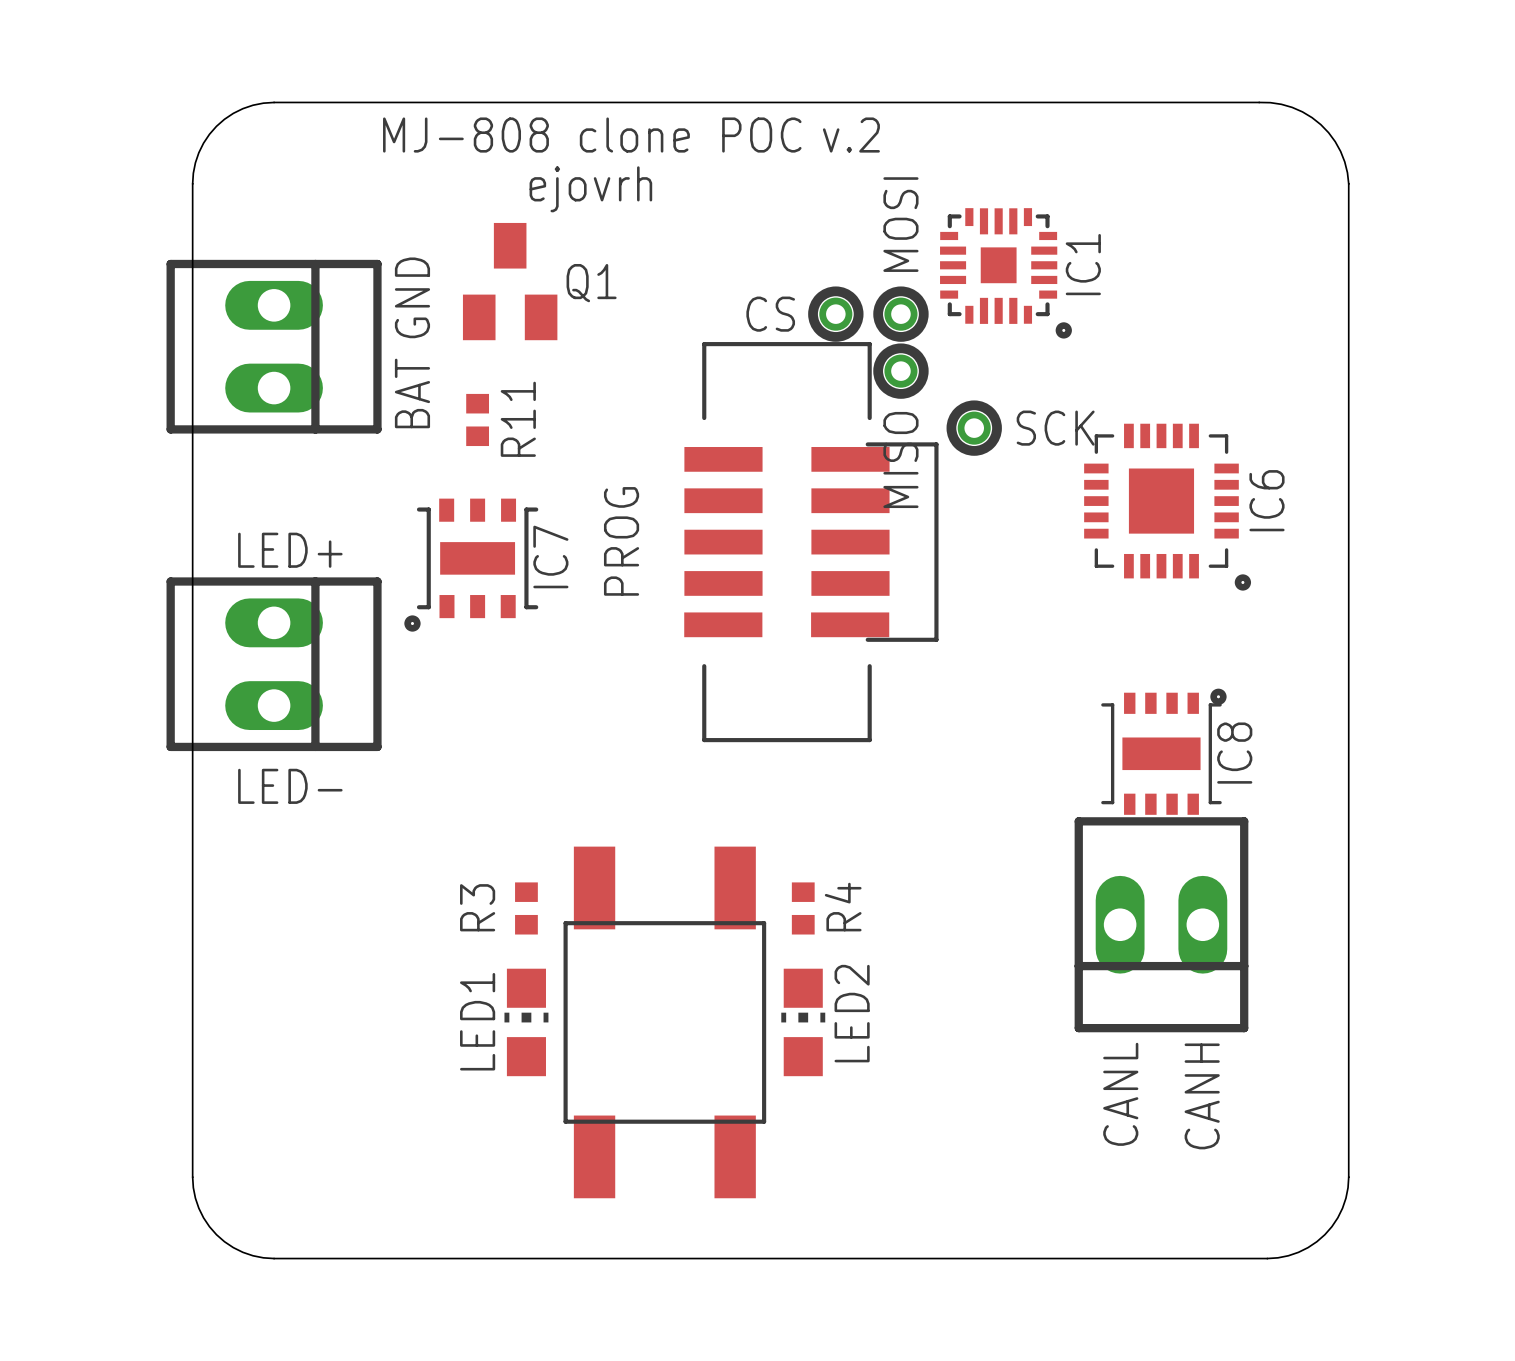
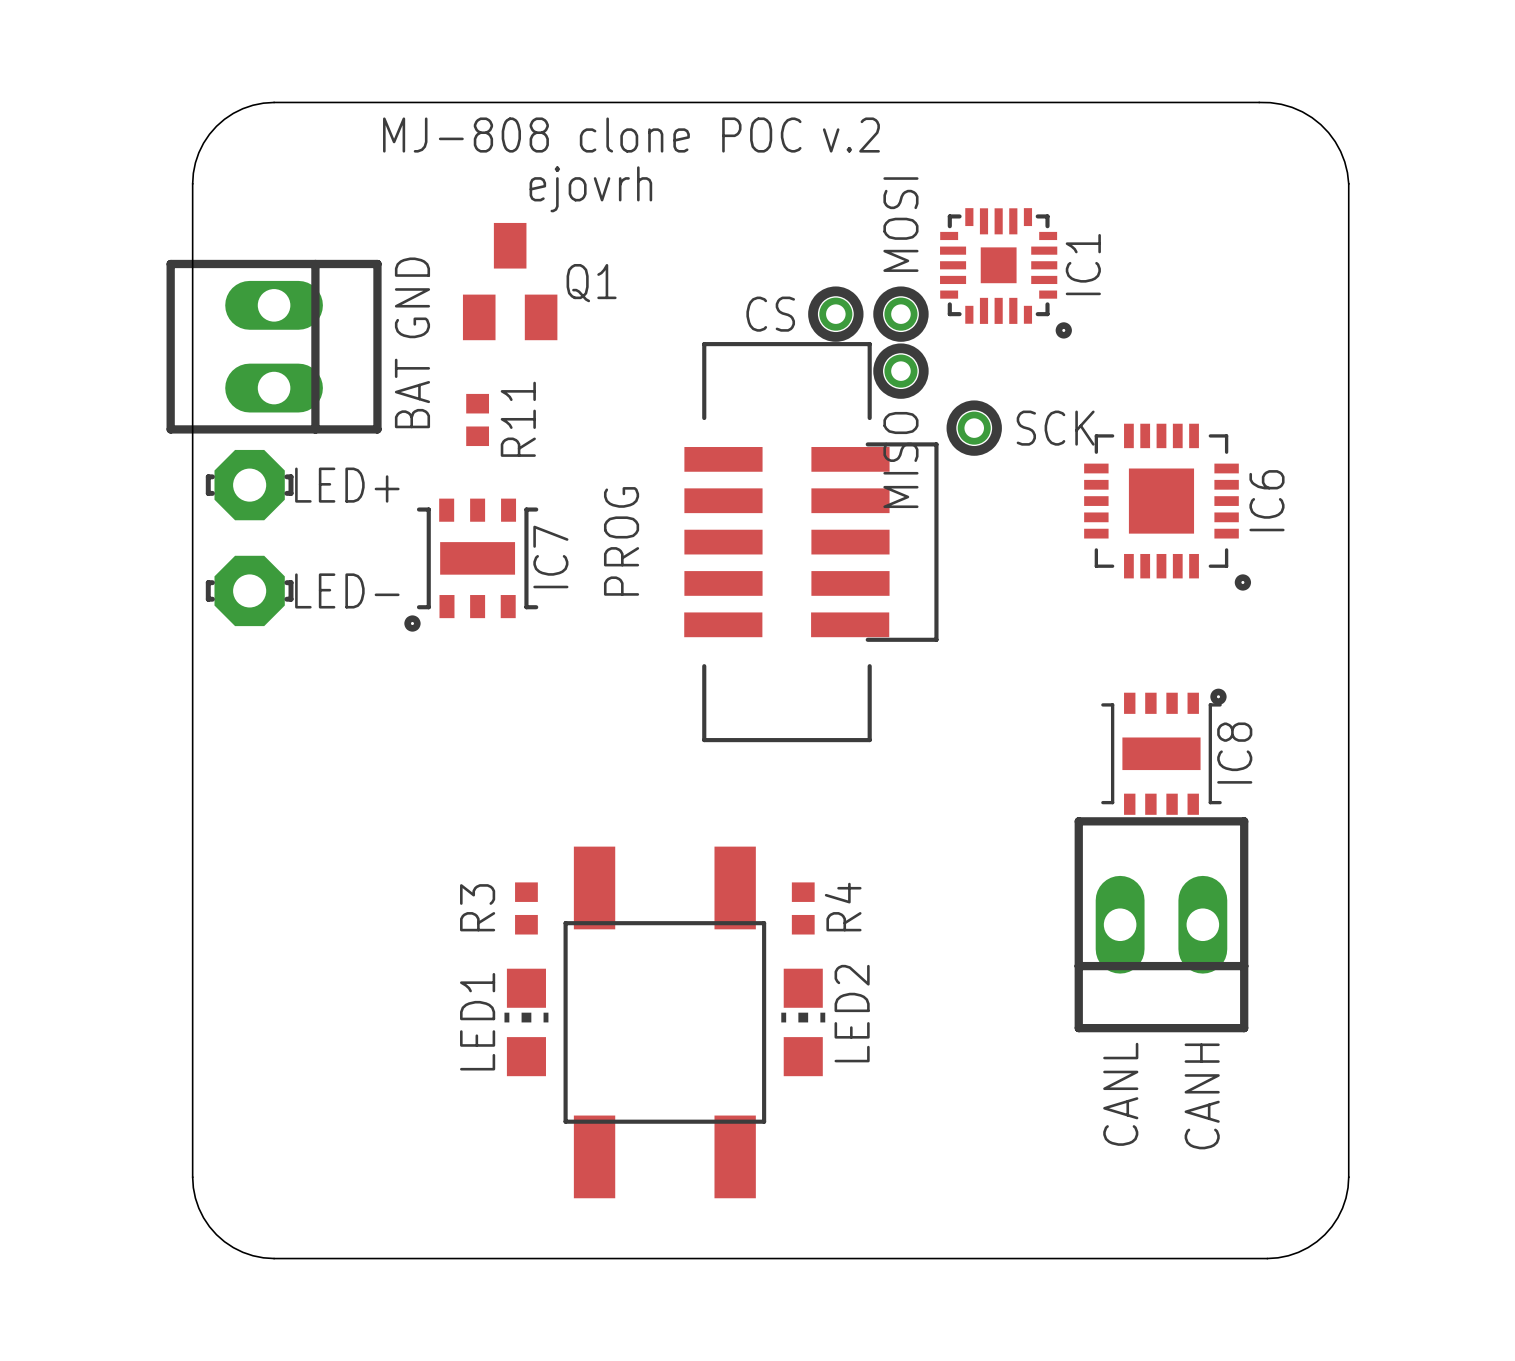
part: none -> (249, 485)
text position: LED+ (290, 550) -> LED+ (347, 485)
part: none -> (249, 590)
part: (274, 664) -> none
text position: LED- (290, 786) -> LED- (347, 590)

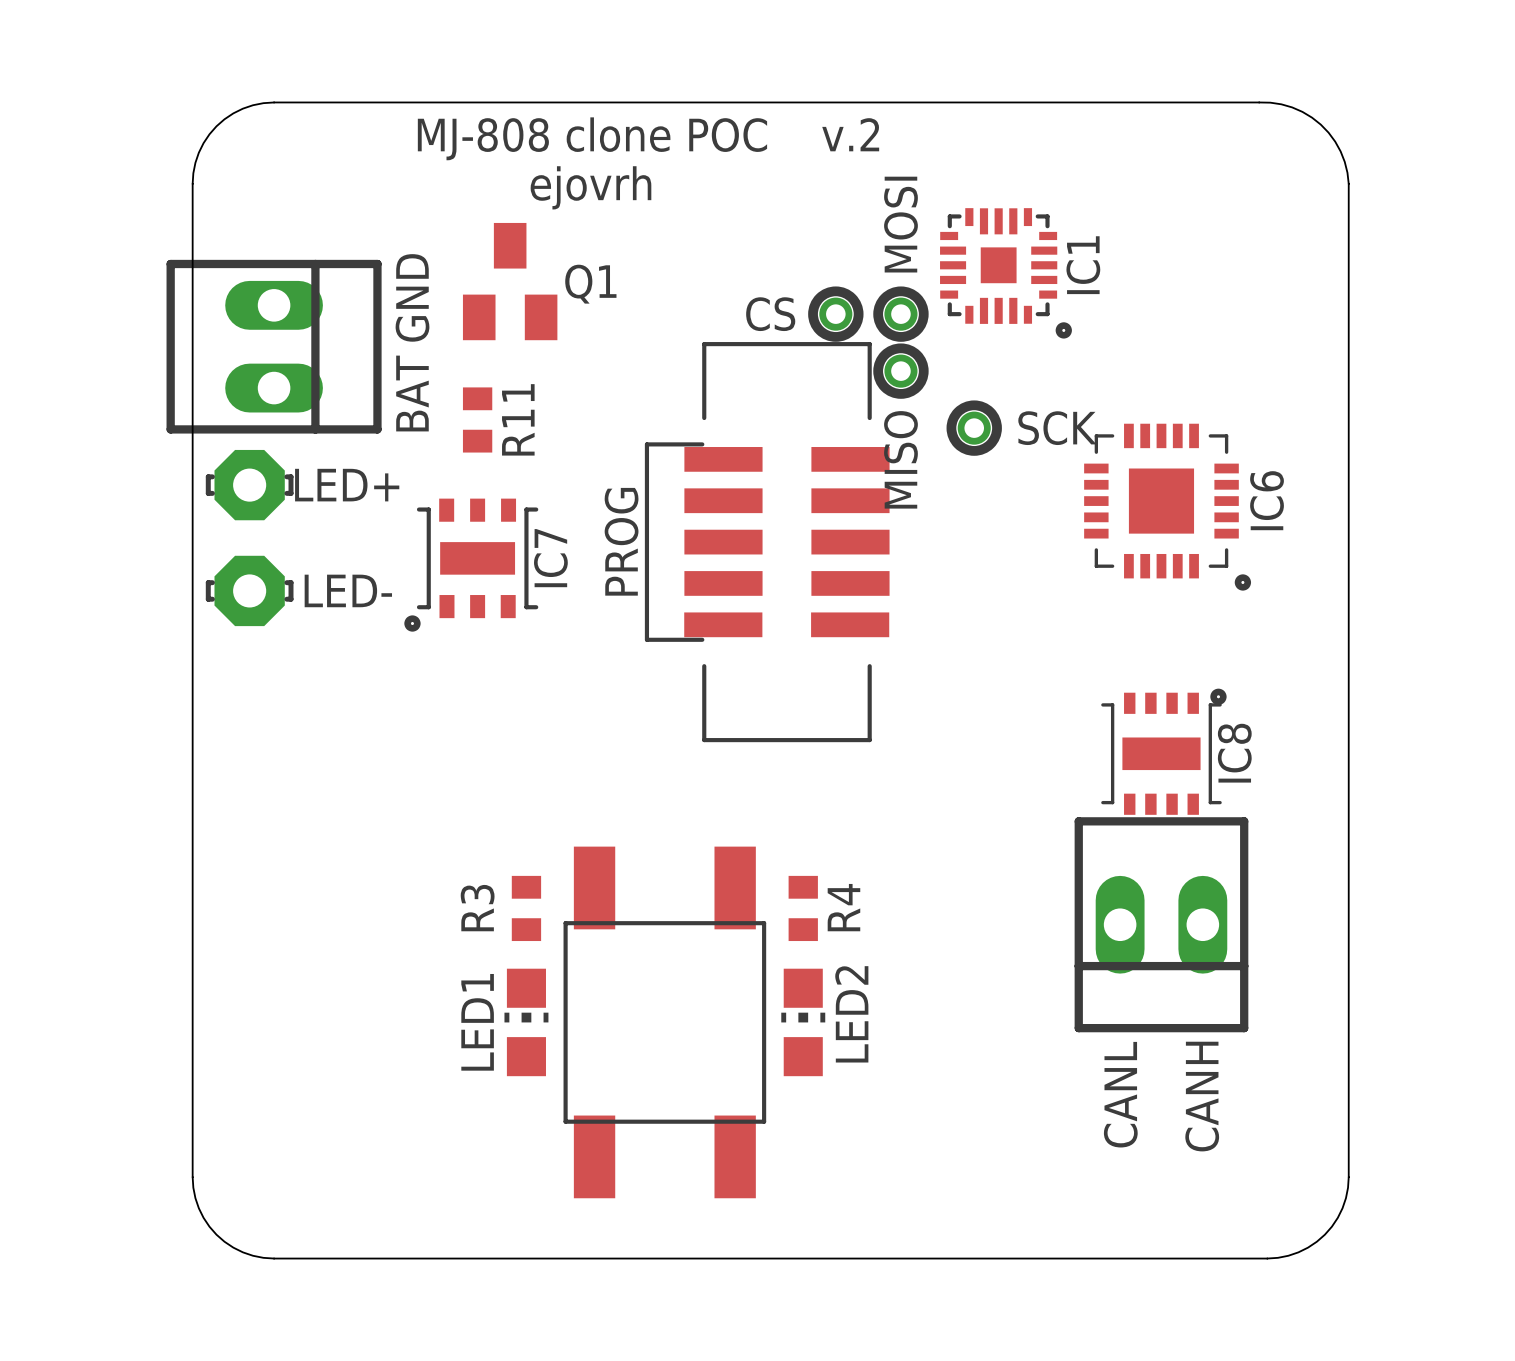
R11 footprint: [466, 393, 490, 447] -> [462, 387, 493, 453]
PROG: none -> (767, 542)
PROG: (811, 542) -> none
R3 footprint: [515, 882, 538, 935] -> [511, 875, 542, 942]
R4 footprint: [791, 882, 815, 935] -> [788, 875, 818, 942]

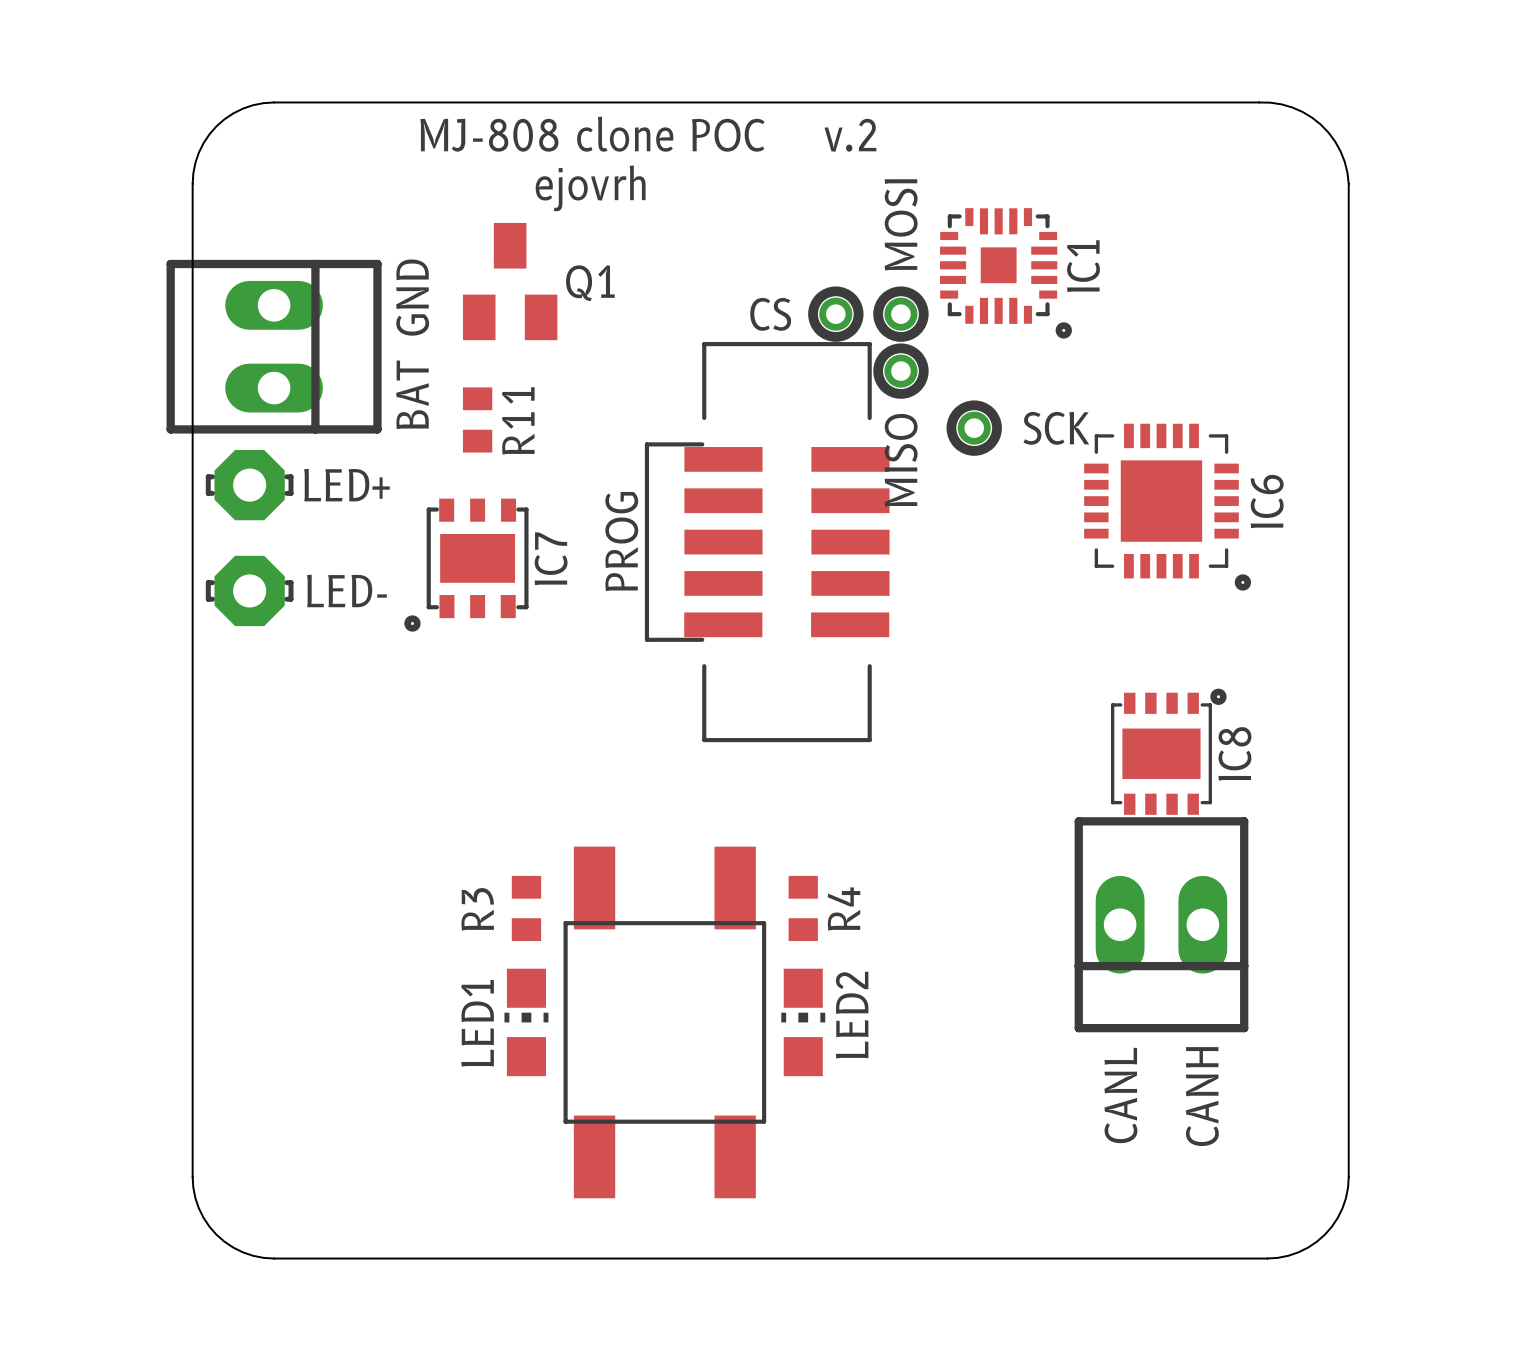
IC6 footprint: [1084, 423, 1252, 591] -> [1084, 423, 1252, 591]
IC7 footprint: [404, 498, 539, 632] -> [404, 498, 529, 632]
IC8 footprint: [1101, 688, 1227, 815] -> [1110, 688, 1227, 815]

